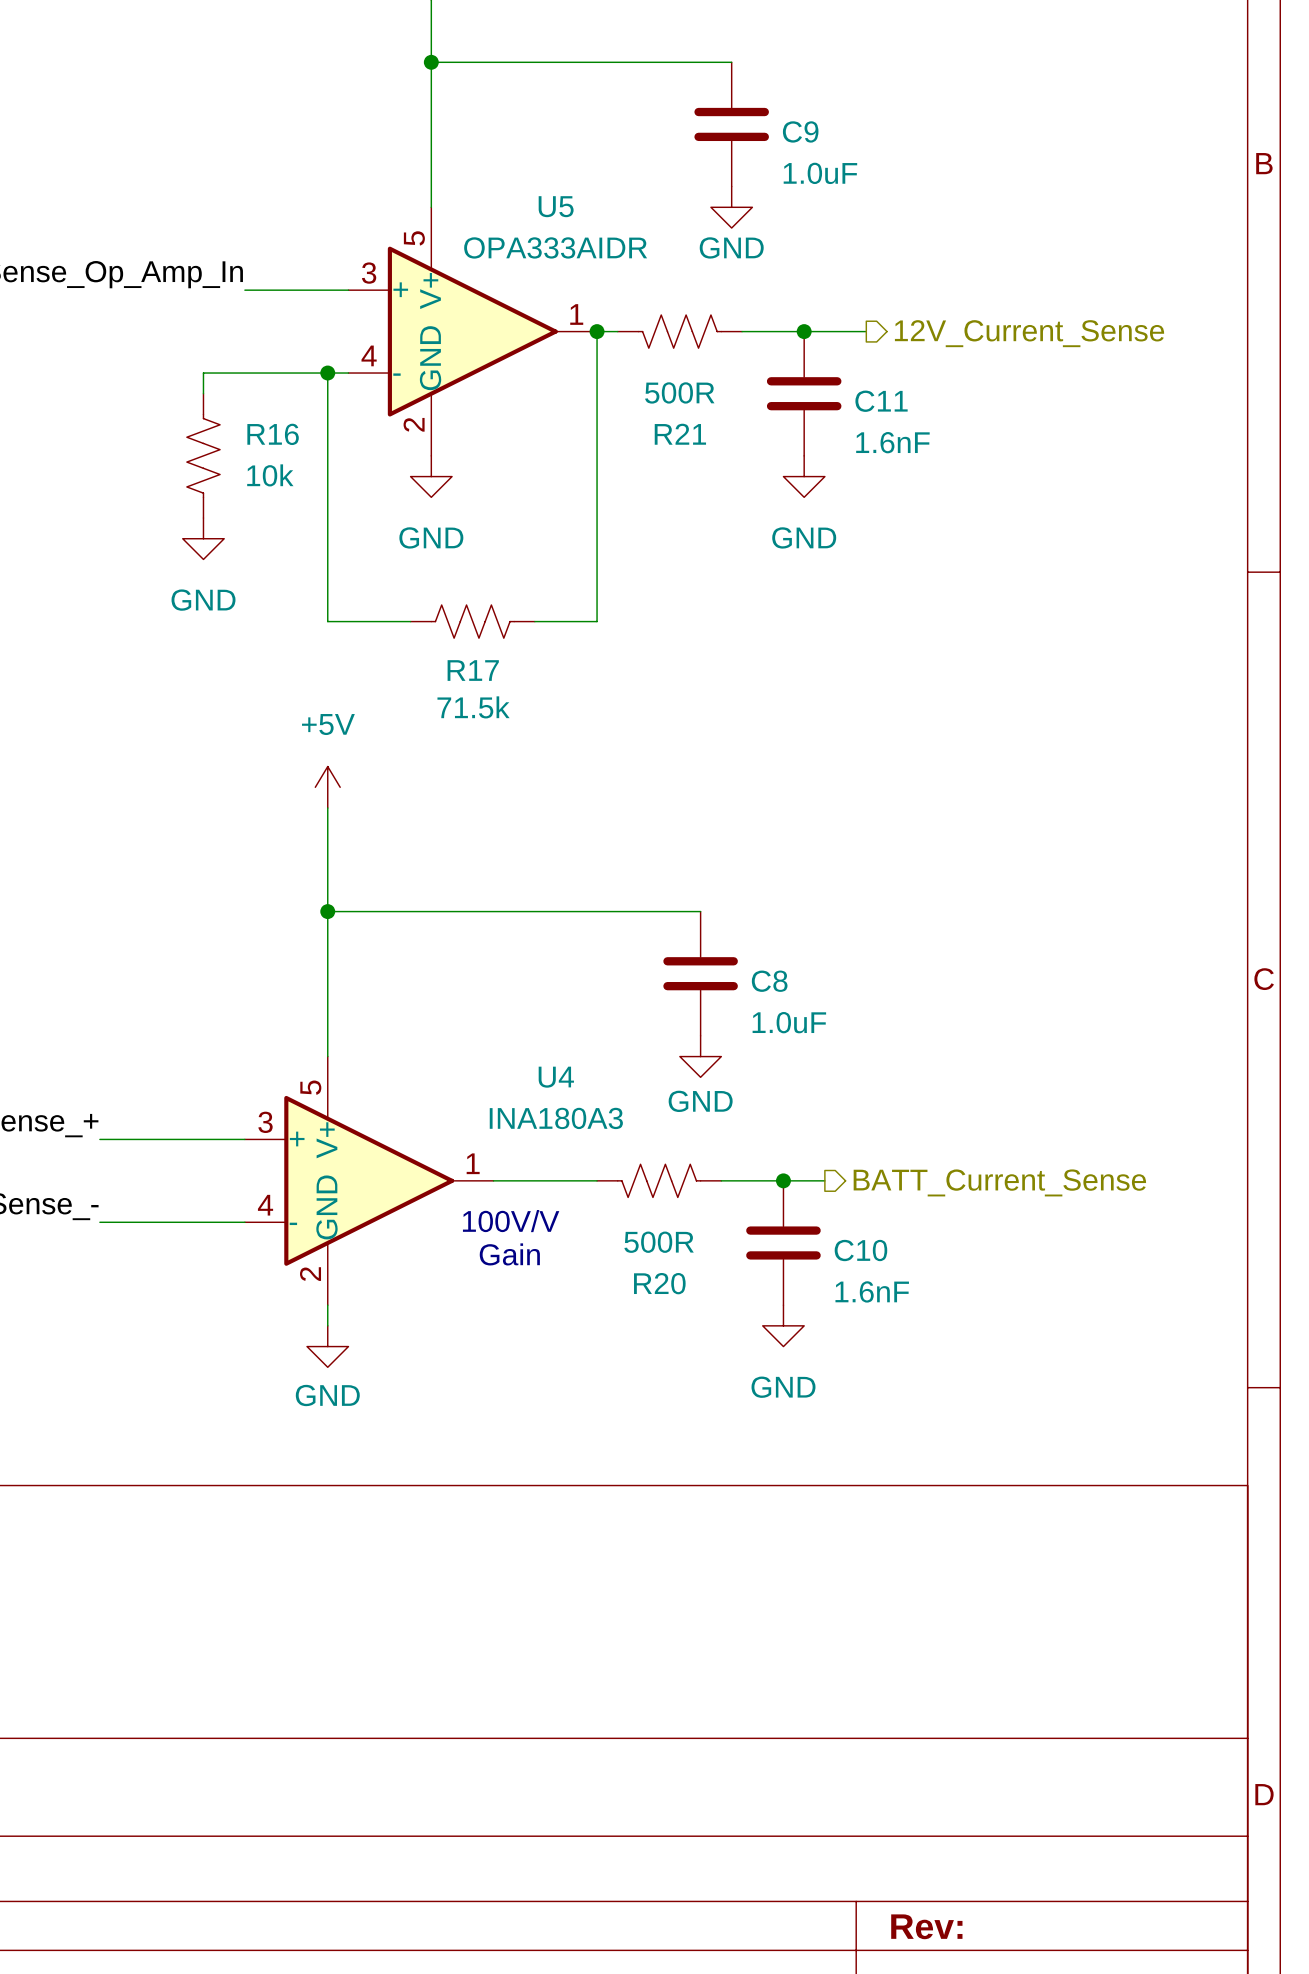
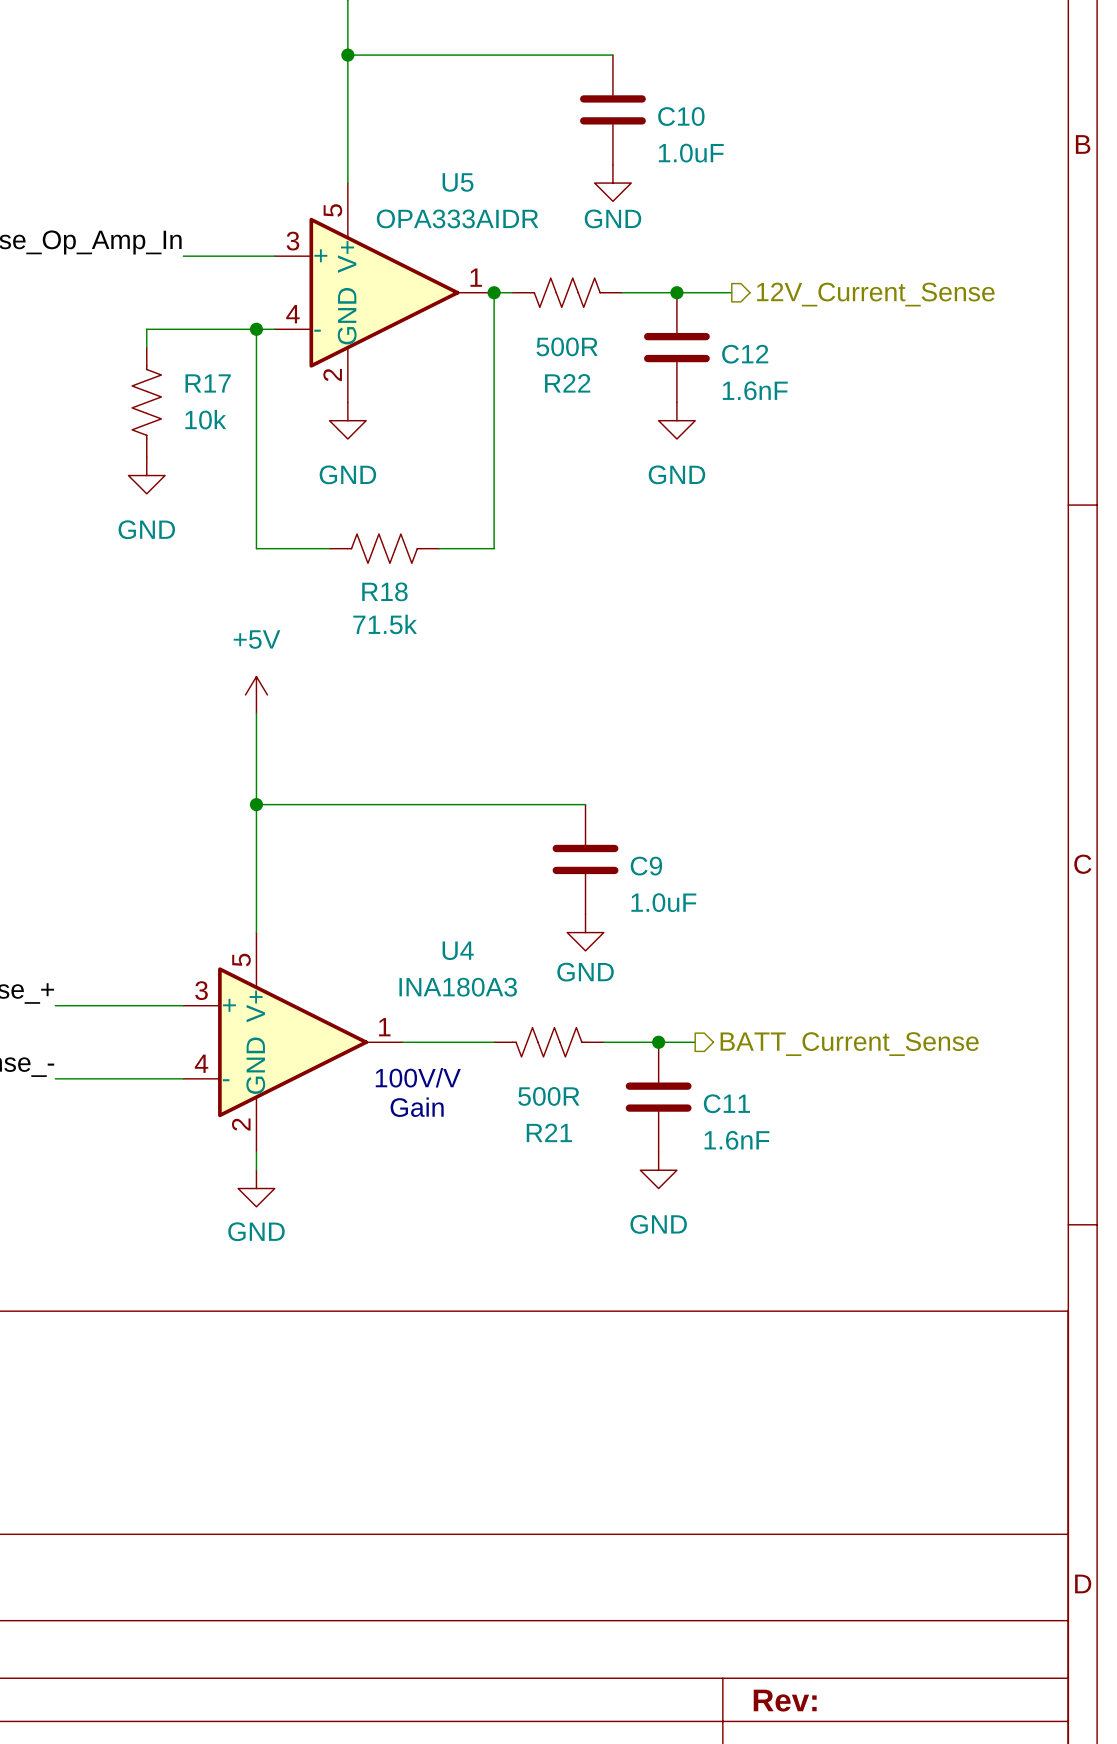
C9 name: C9 (800, 131) -> C10 (681, 116)
C11 name: C11 (881, 401) -> C12 (745, 354)
R16 name: R16 (273, 434) -> R17 (208, 383)
R21 name: R21 (680, 434) -> R22 (567, 383)
R17 name: R17 (473, 670) -> R18 (384, 591)
C8 name: C8 (769, 981) -> C9 (646, 866)
C10 name: C10 (860, 1250) -> C11 (726, 1103)
R20 name: R20 (659, 1283) -> R21 (549, 1132)

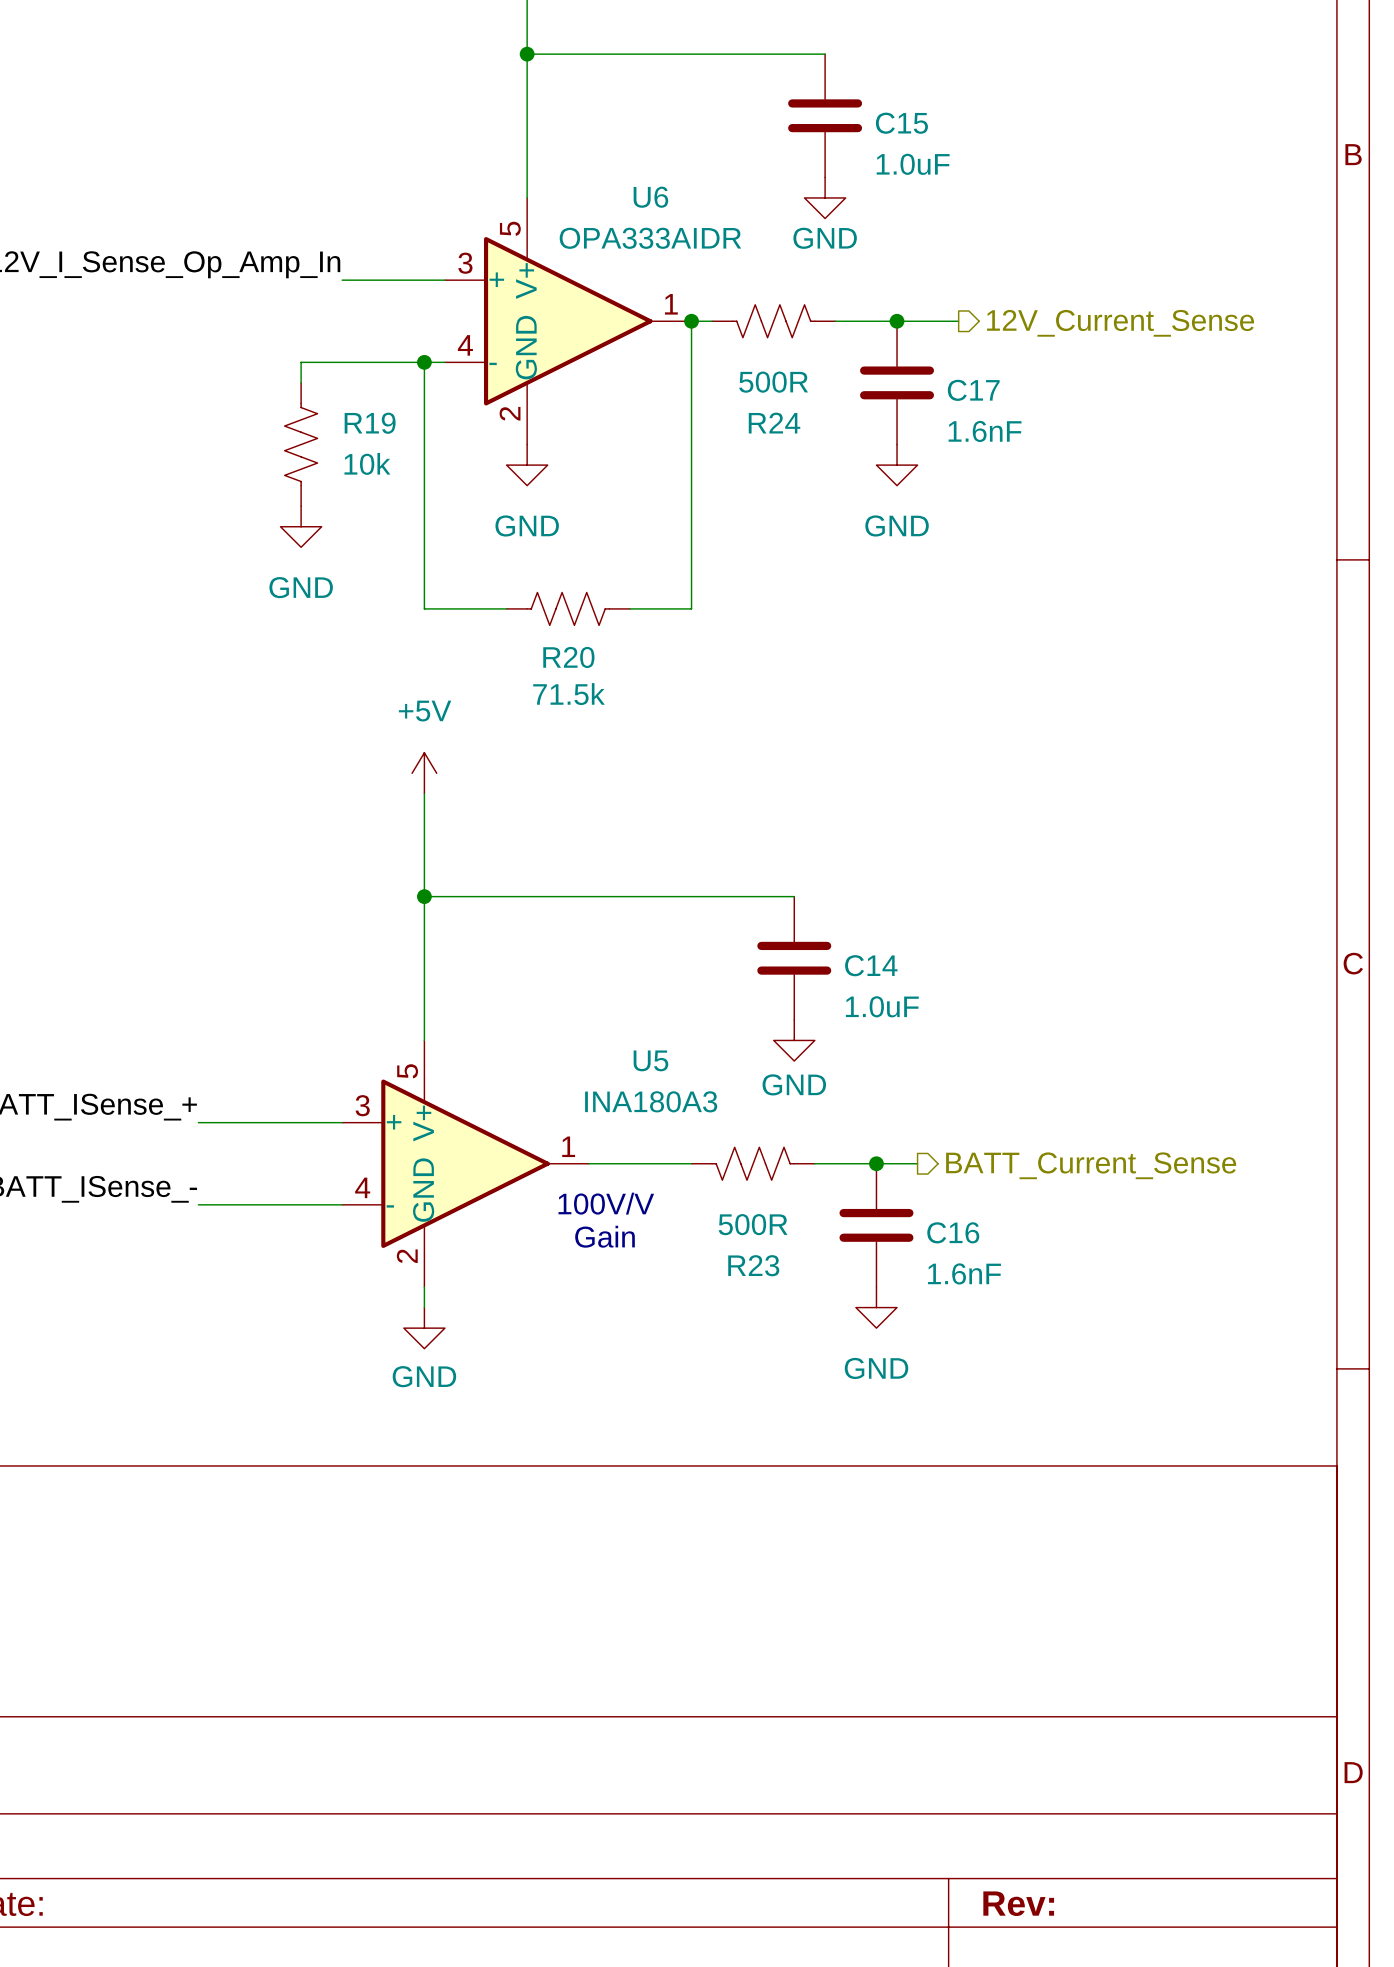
C10 name: C10 (681, 116) -> C15 (901, 123)
U5 name: U5 (458, 182) -> U6 (650, 197)
C12 name: C12 (745, 354) -> C17 (973, 390)
R17 name: R17 (208, 383) -> R19 (370, 423)
R22 name: R22 (567, 383) -> R24 (774, 423)
R18 name: R18 (384, 591) -> R20 (568, 657)
C9 name: C9 (646, 866) -> C14 (871, 965)
U4 name: U4 (458, 950) -> U5 (650, 1060)
C11 name: C11 (726, 1103) -> C16 (953, 1232)
R21 name: R21 (549, 1132) -> R23 (753, 1265)

